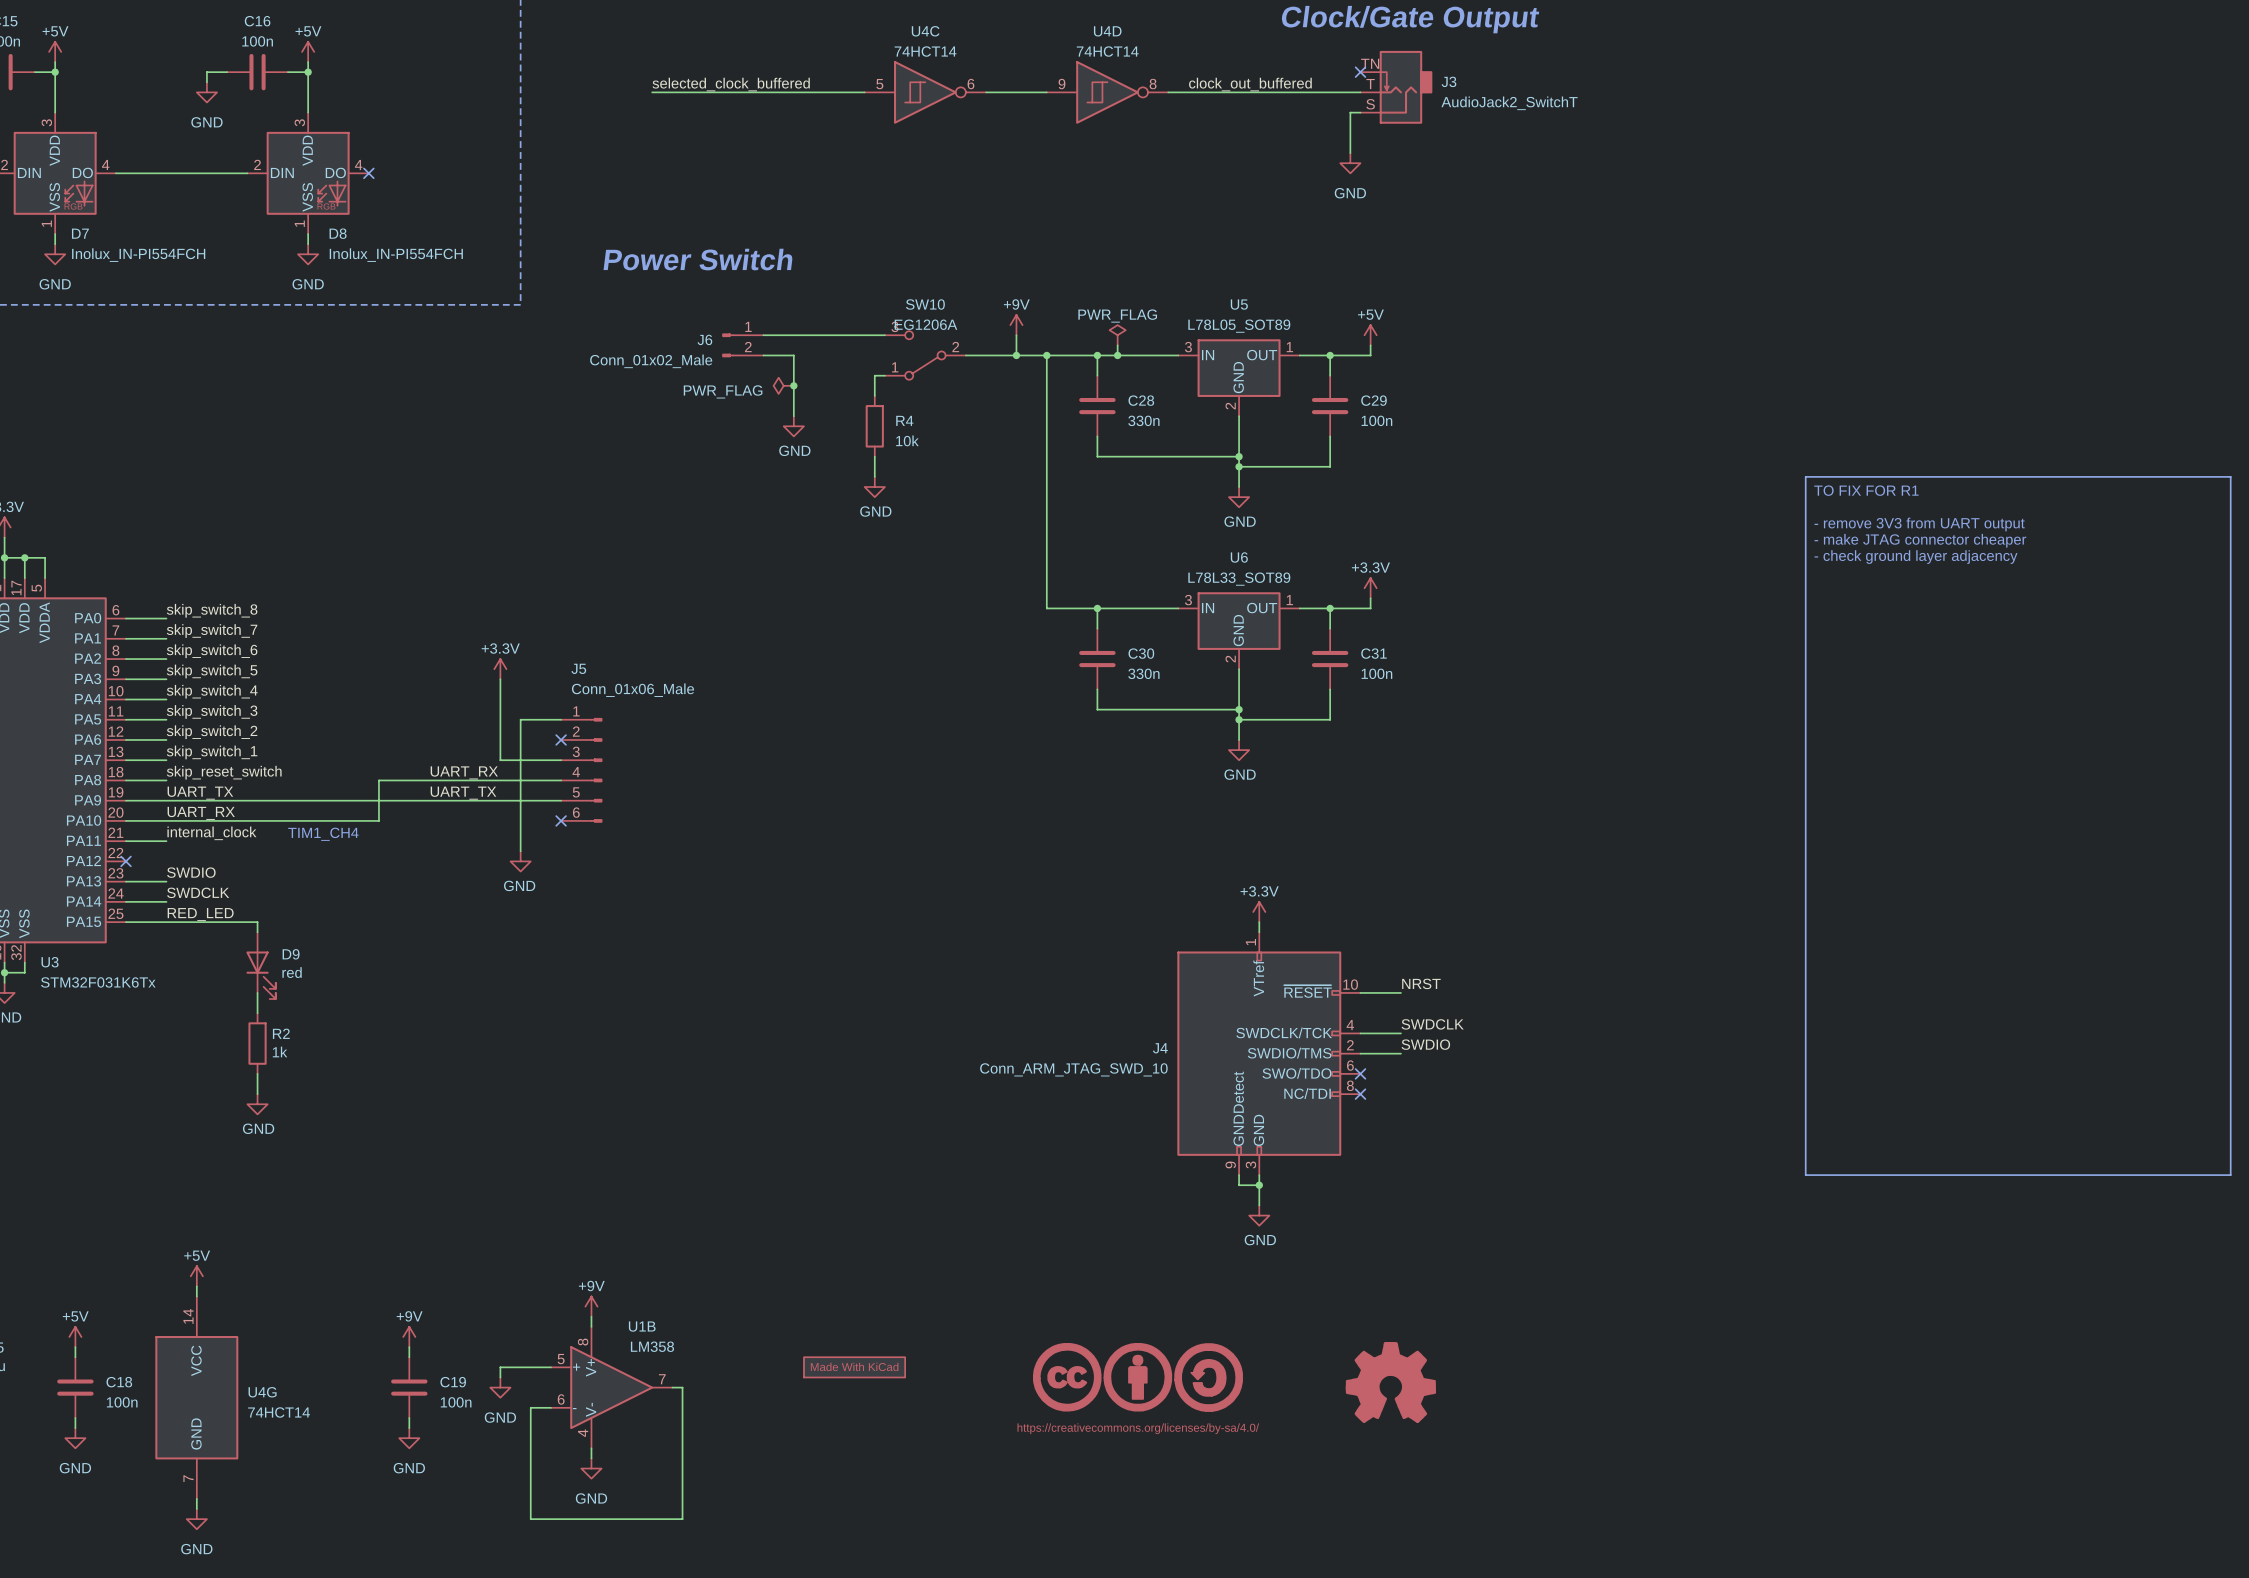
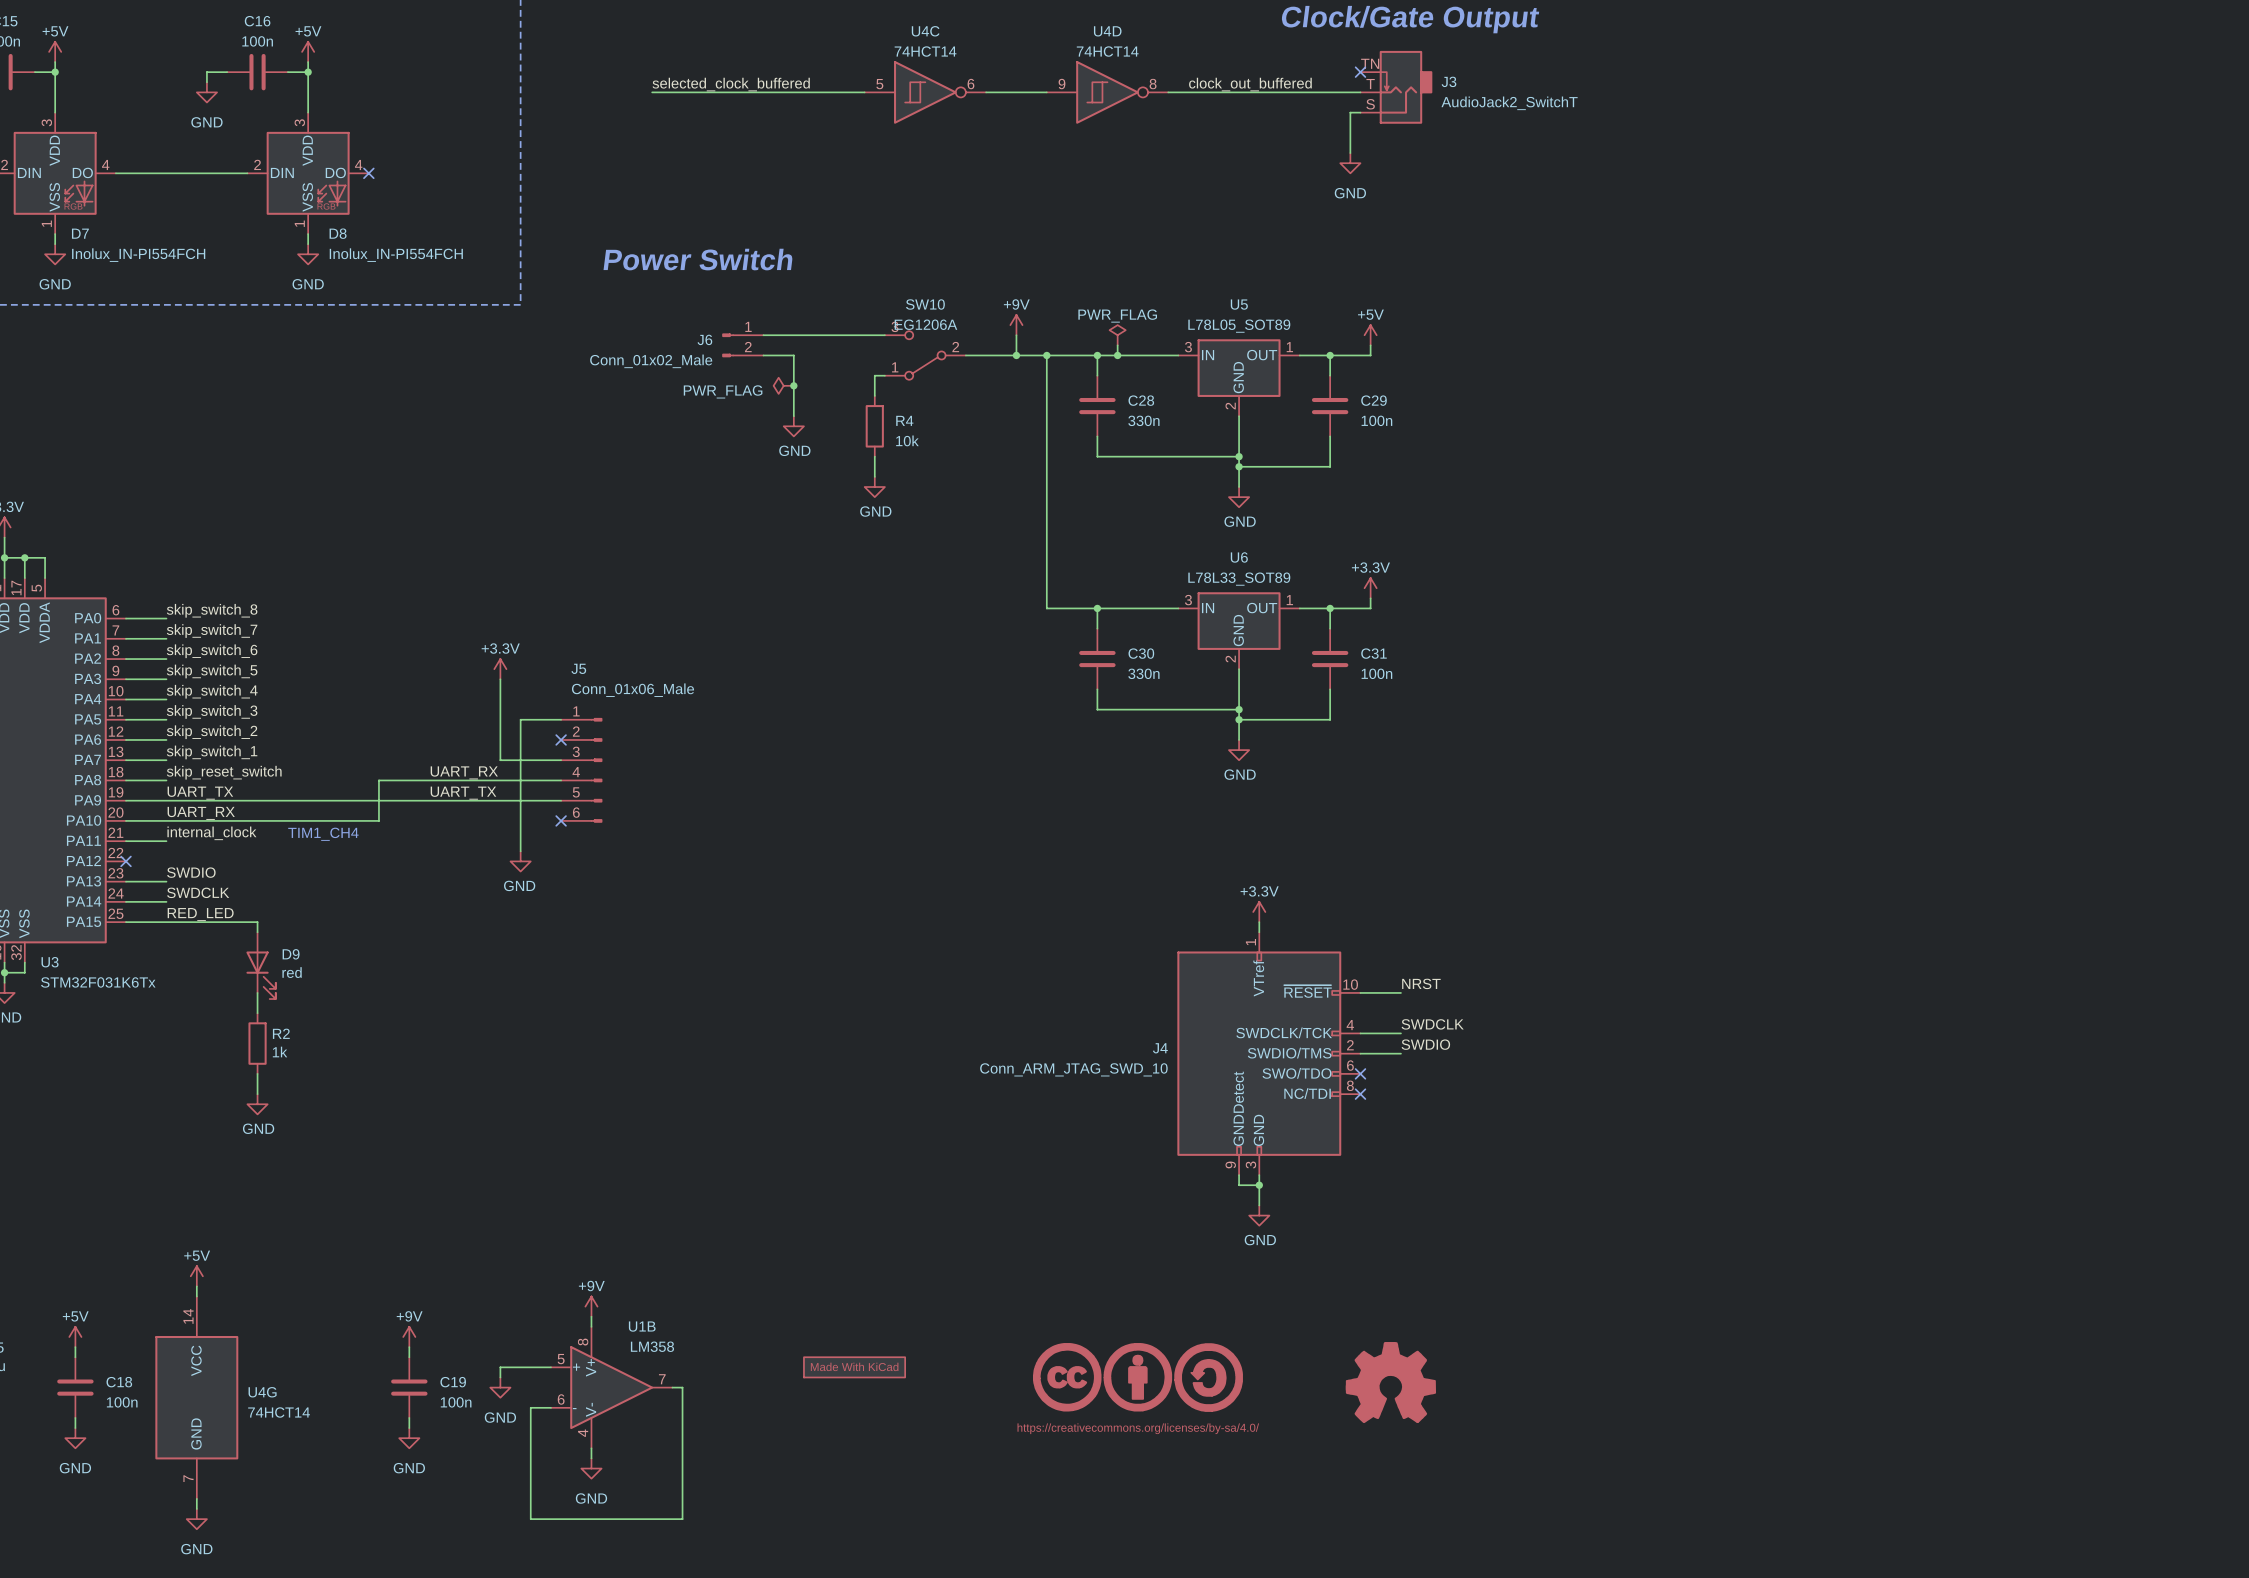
line: (1805, 476) (2230, 476) (2230, 1175) (1805, 1175) (1805, 476) -> none
text: TO FIX FOR R1 (1866, 490) -> none
text: - remove 3V3 from UART output (1919, 524) -> none
text: - make JTAG connector cheaper (1920, 540) -> none
text: - check ground layer adjacency (1916, 557) -> none

